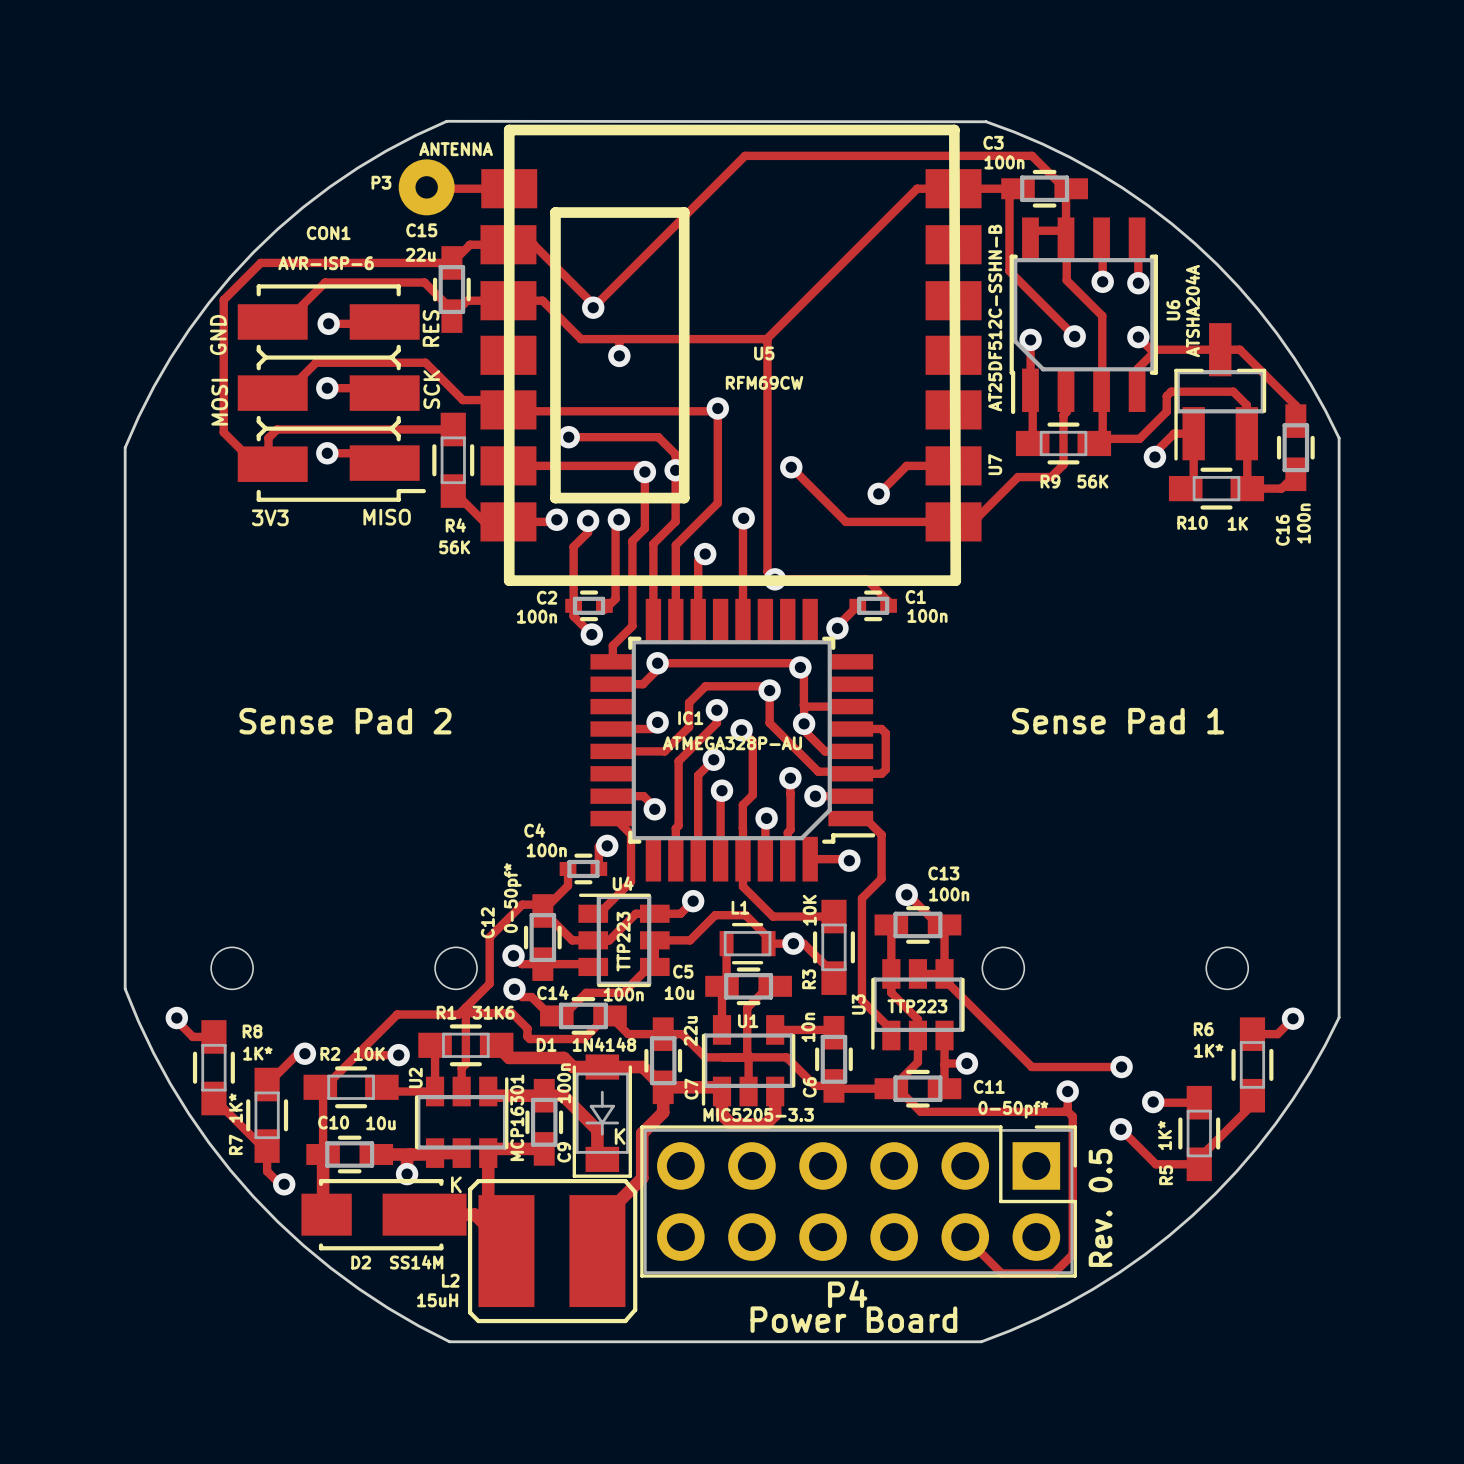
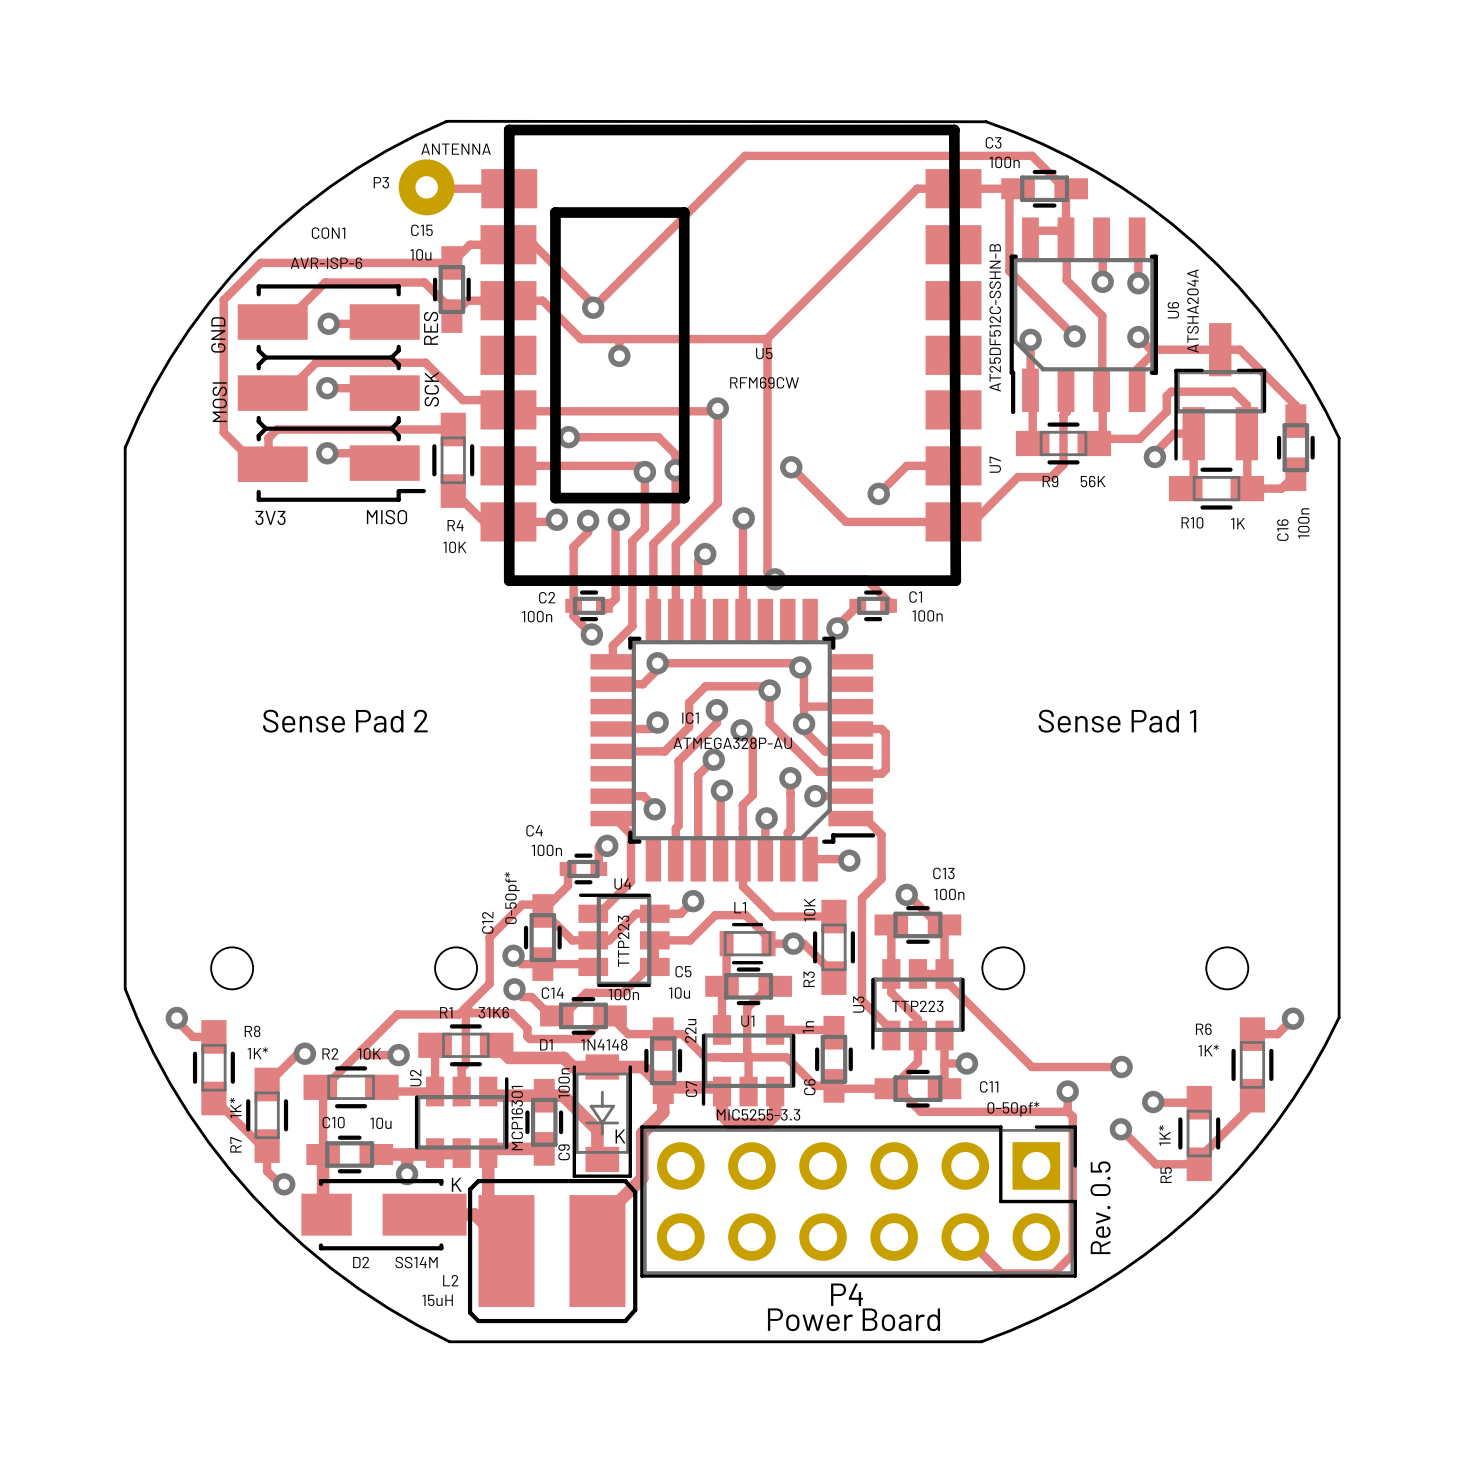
C15 value: 22u (420, 254) -> 10u (420, 254)
R4 value: 56K (454, 547) -> 10K (454, 547)
C6 value: 10n (808, 1027) -> 1n (808, 1027)
U1 value: MIC5205-3.3 (758, 1114) -> MIC5255-3.3 (758, 1114)

